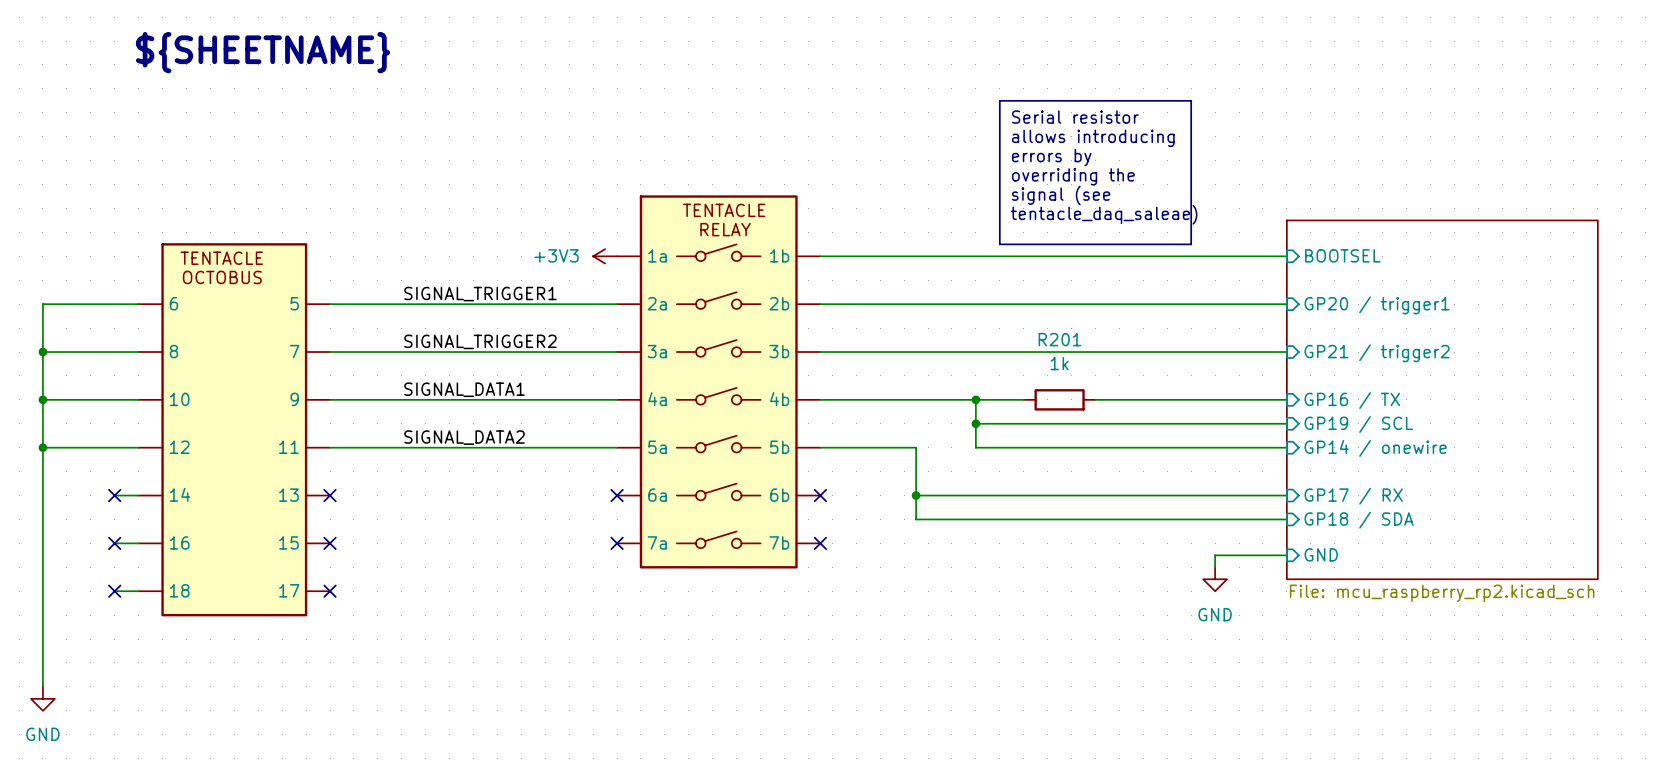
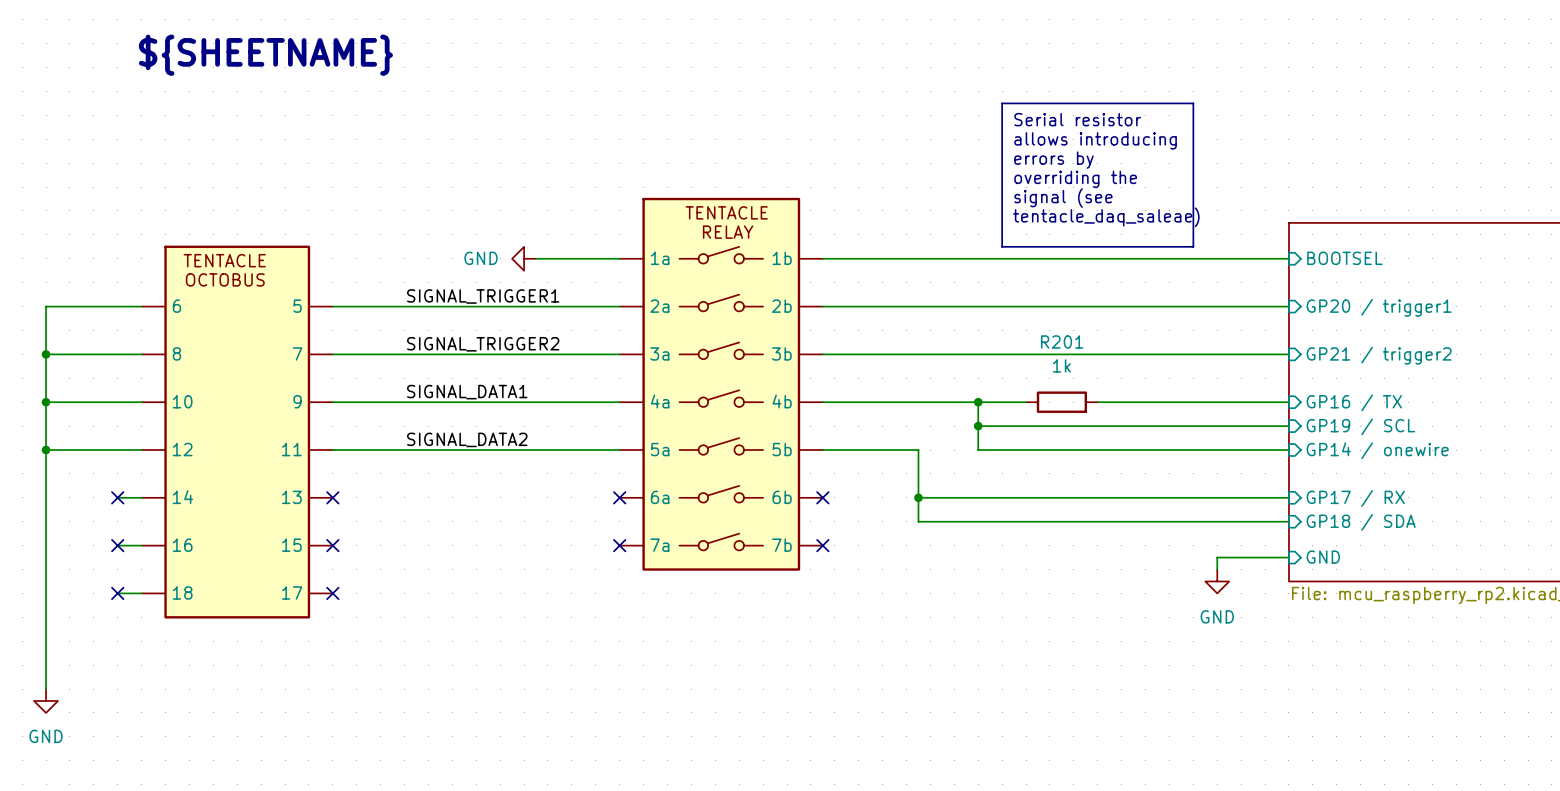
power symbol: none -> GND (524, 258)
wire: none -> (536, 258) (619, 258)
power symbol: +3V3 (605, 256) -> none

